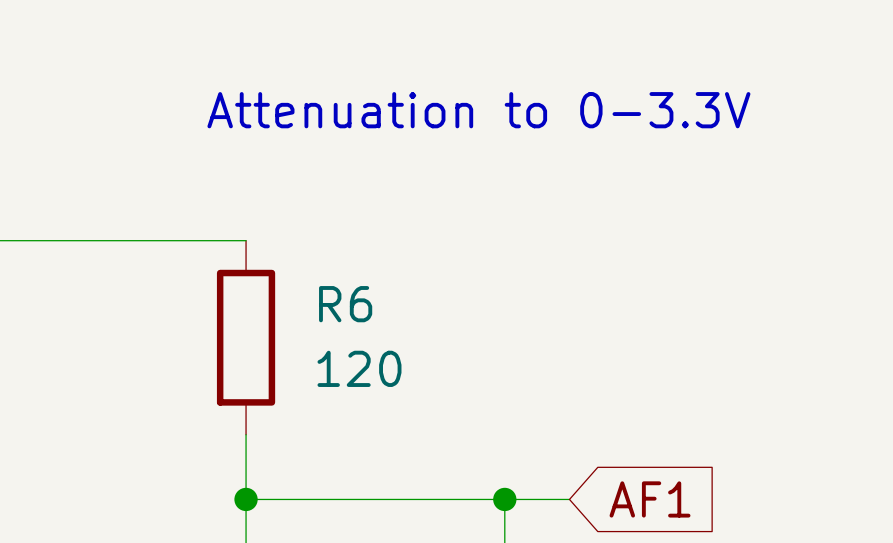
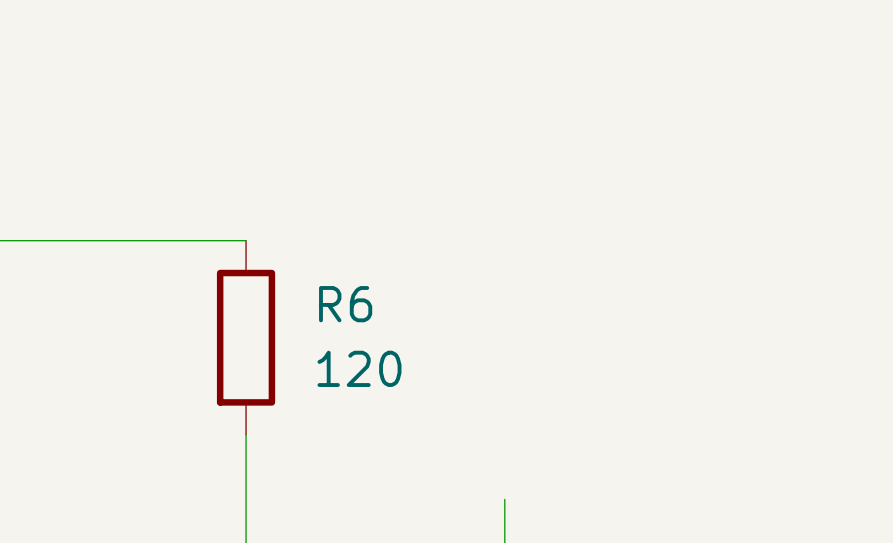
text: Attenuation to 0-3.3V (478, 110) -> none
wire: (246, 499) (569, 499) -> none
junction: (246, 499) -> none
junction: (504, 499) -> none
global label: AF1 (650, 499) -> none

